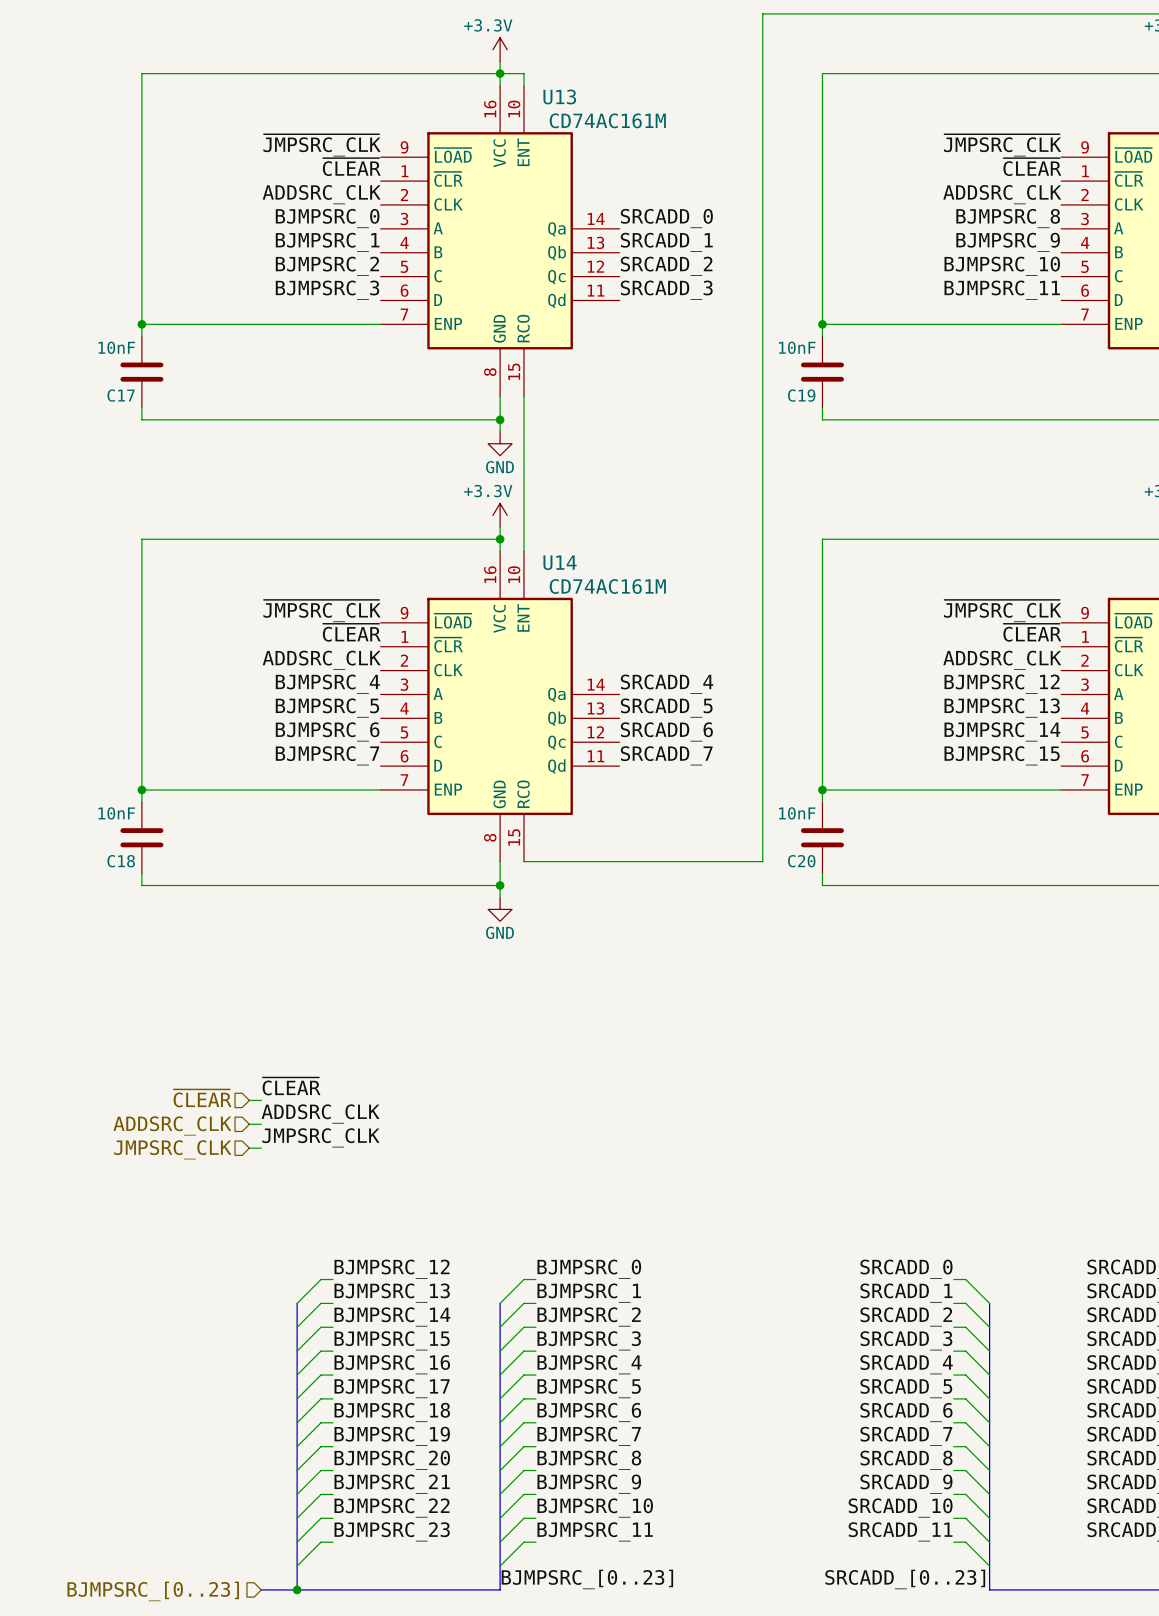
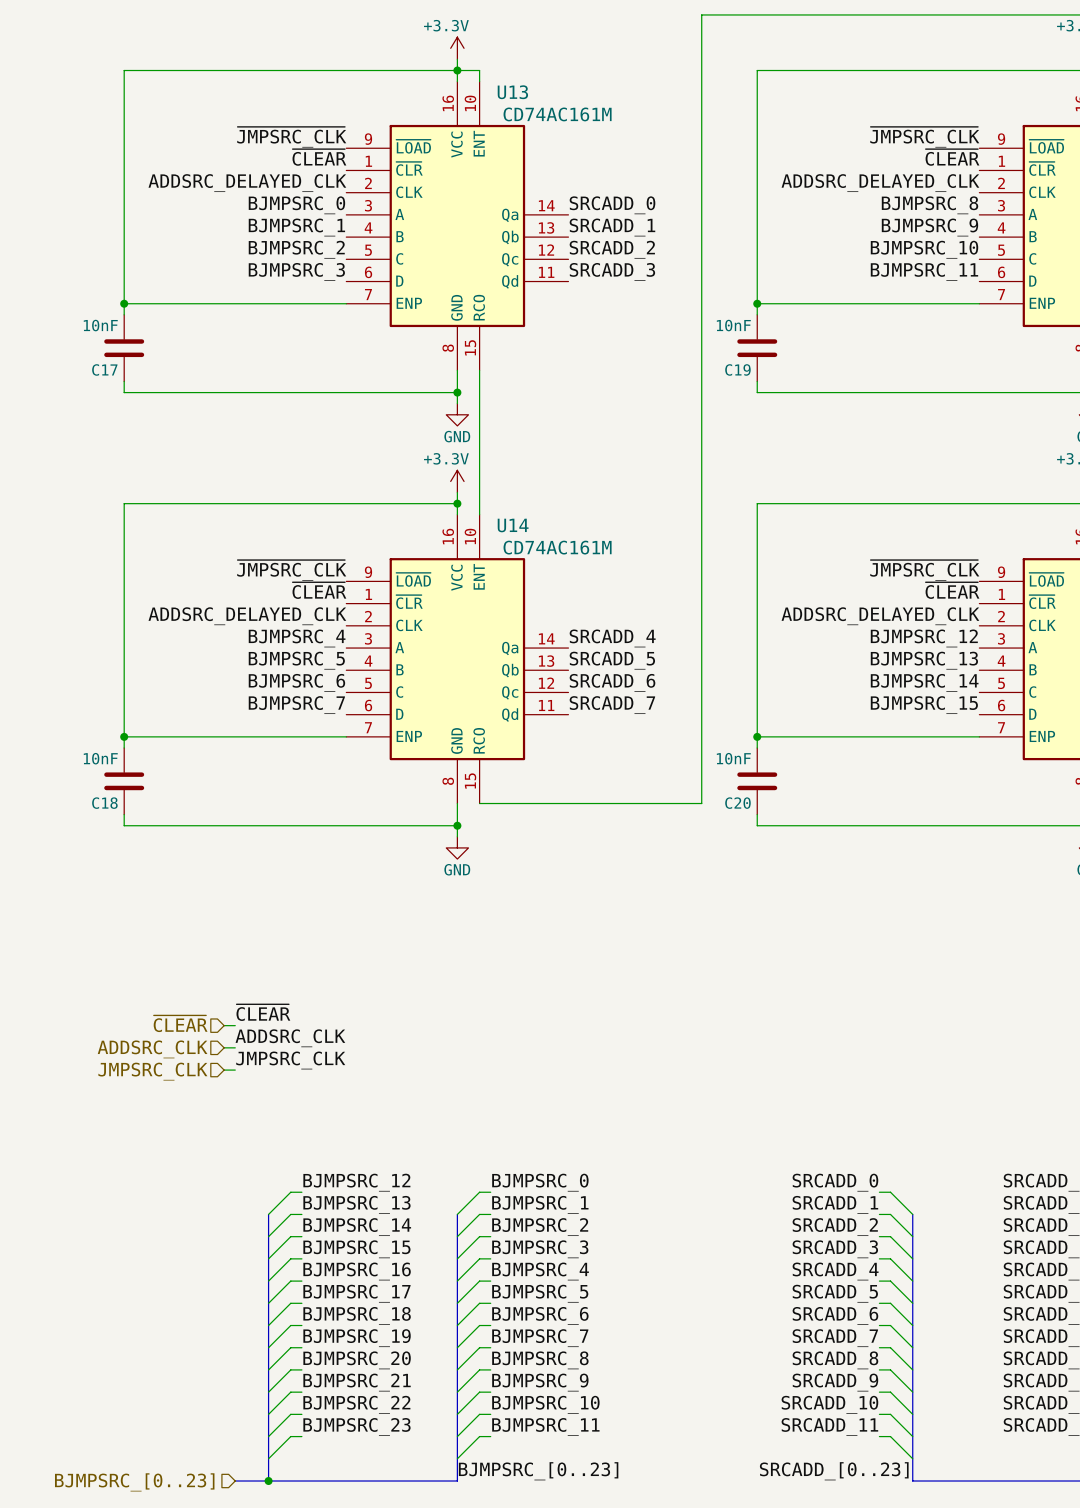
label: ADDSRC_CLK (321, 194) -> ADDSRC_DELAYED_CLK (247, 183)
label: ADDSRC_CLK (1002, 194) -> ADDSRC_DELAYED_CLK (880, 183)
label: ADDSRC_CLK (321, 660) -> ADDSRC_DELAYED_CLK (247, 616)
label: ADDSRC_CLK (1002, 660) -> ADDSRC_DELAYED_CLK (880, 616)

